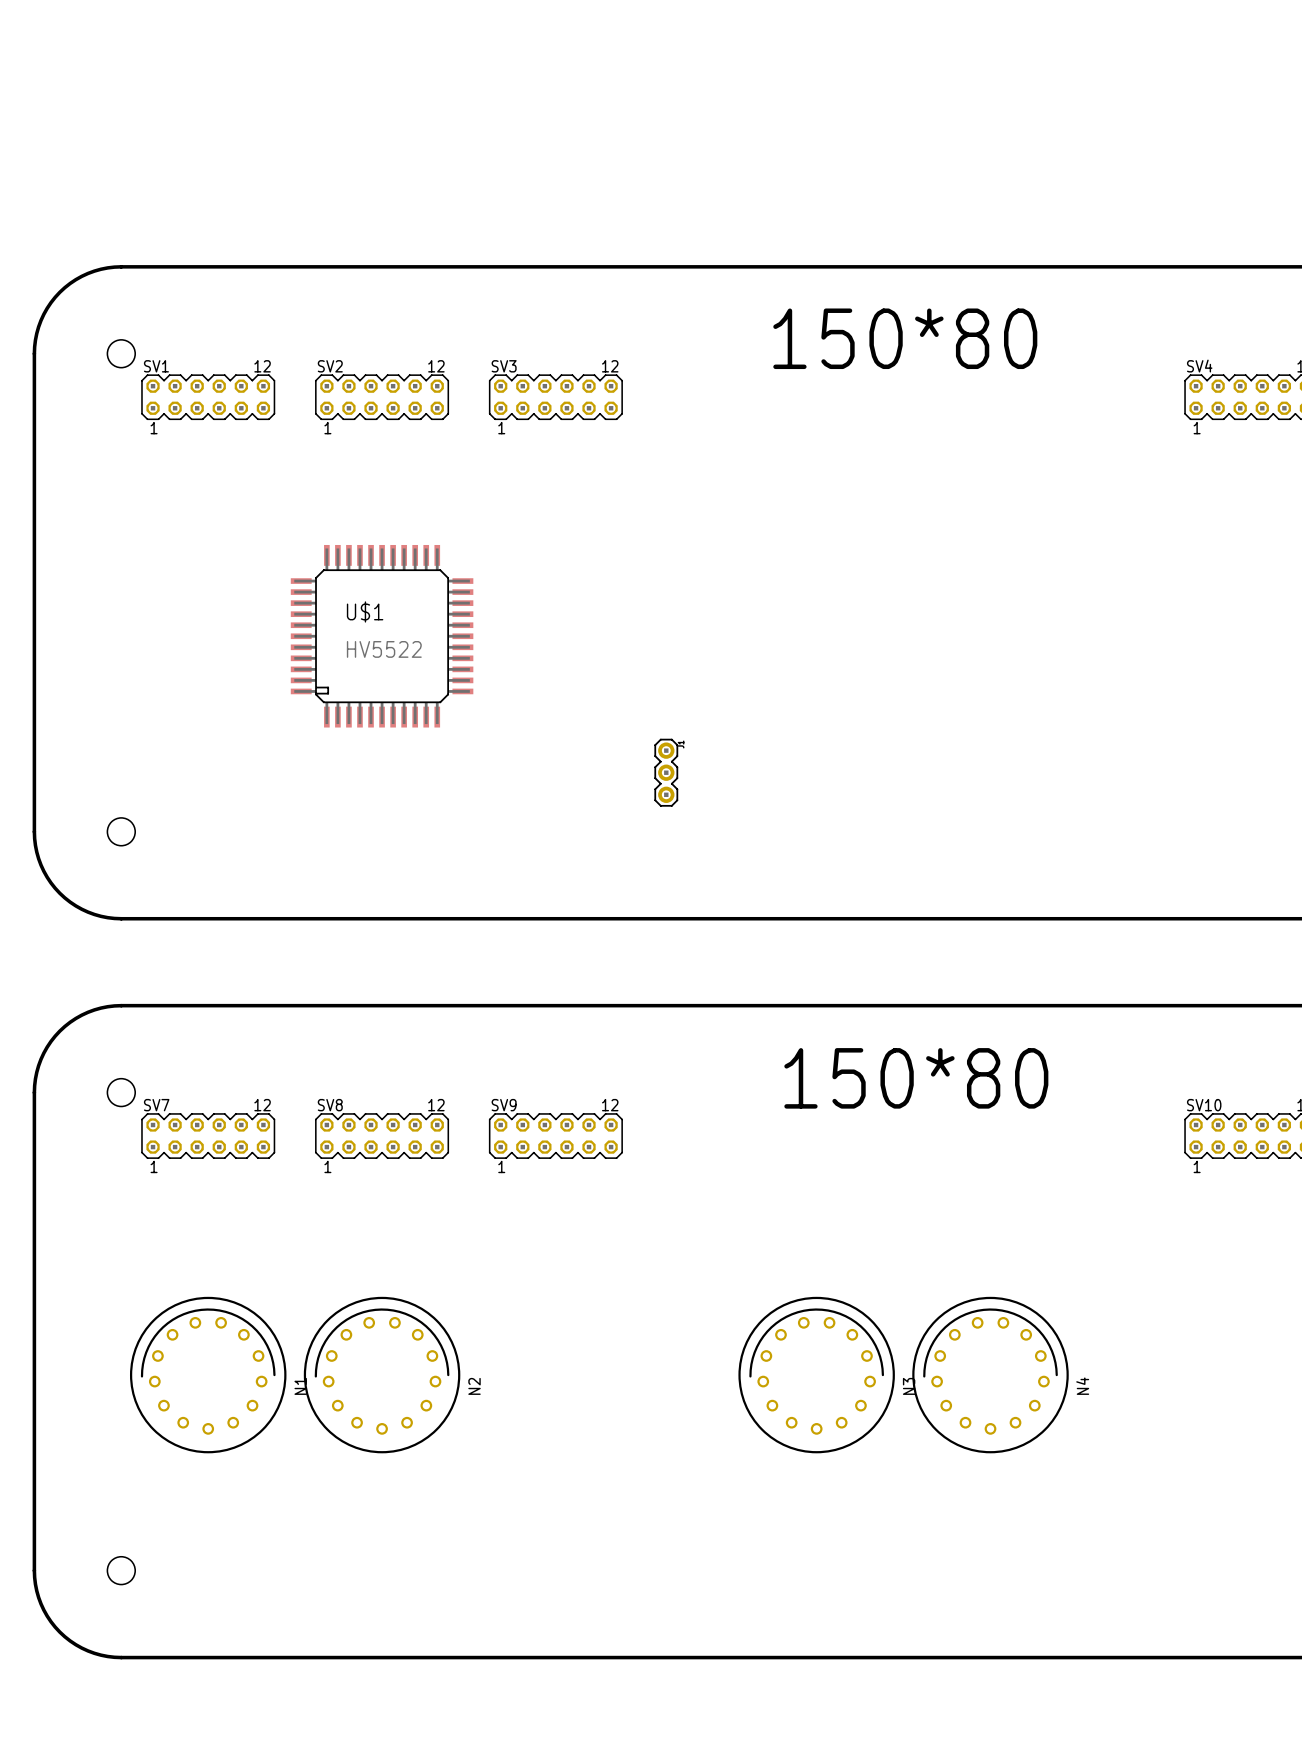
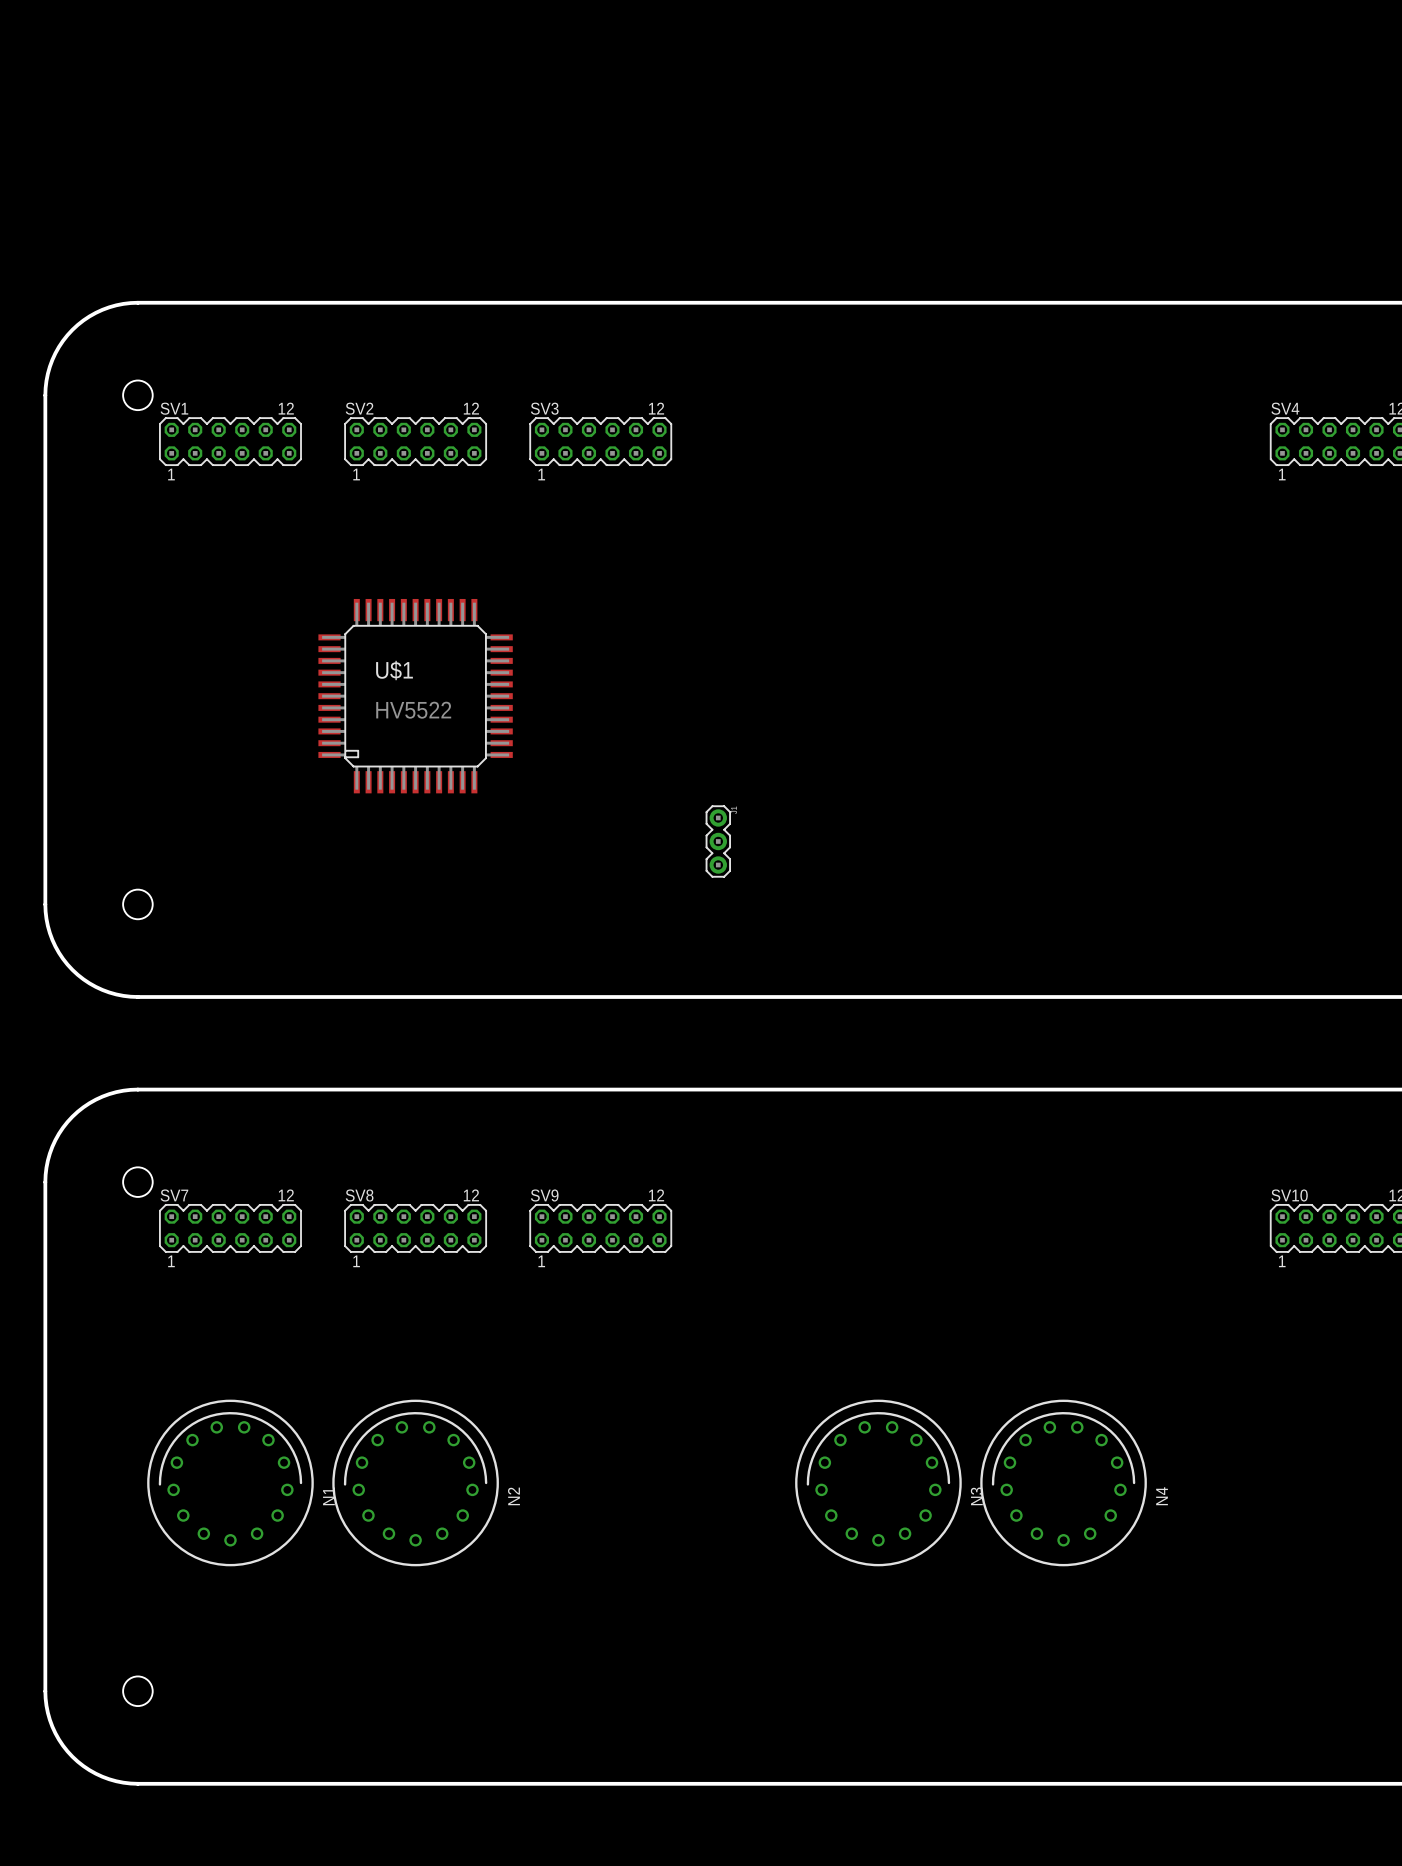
text: 150*80 (905, 338) -> none
text: 150*80 (916, 1078) -> none

